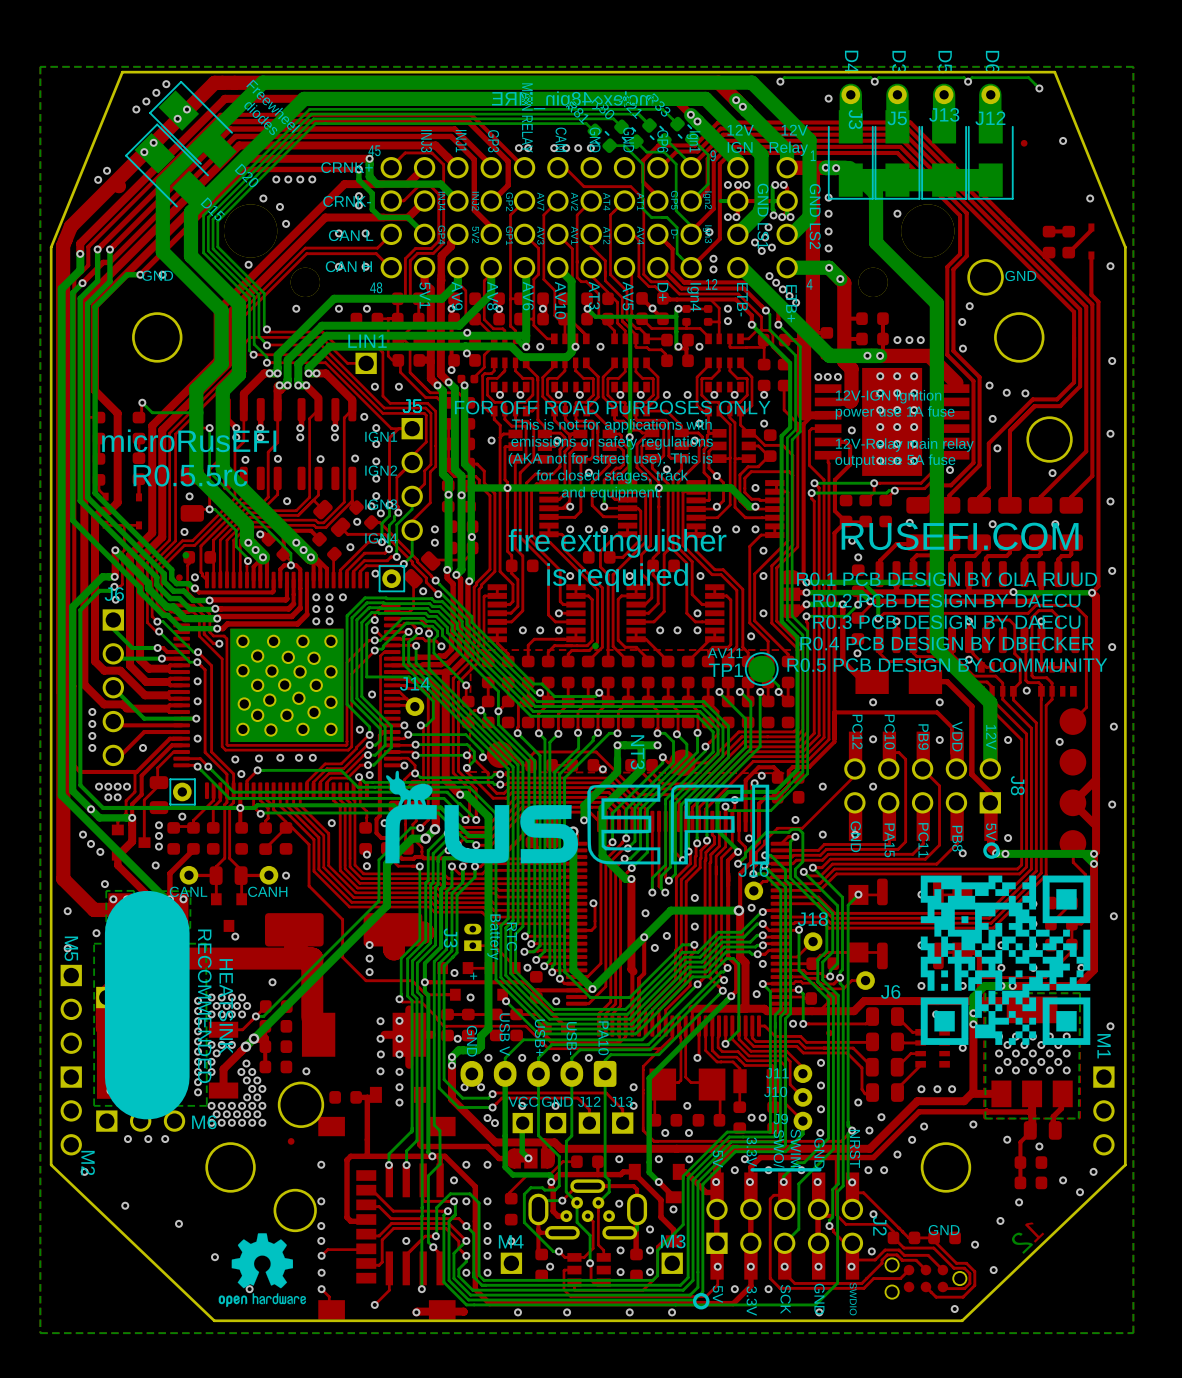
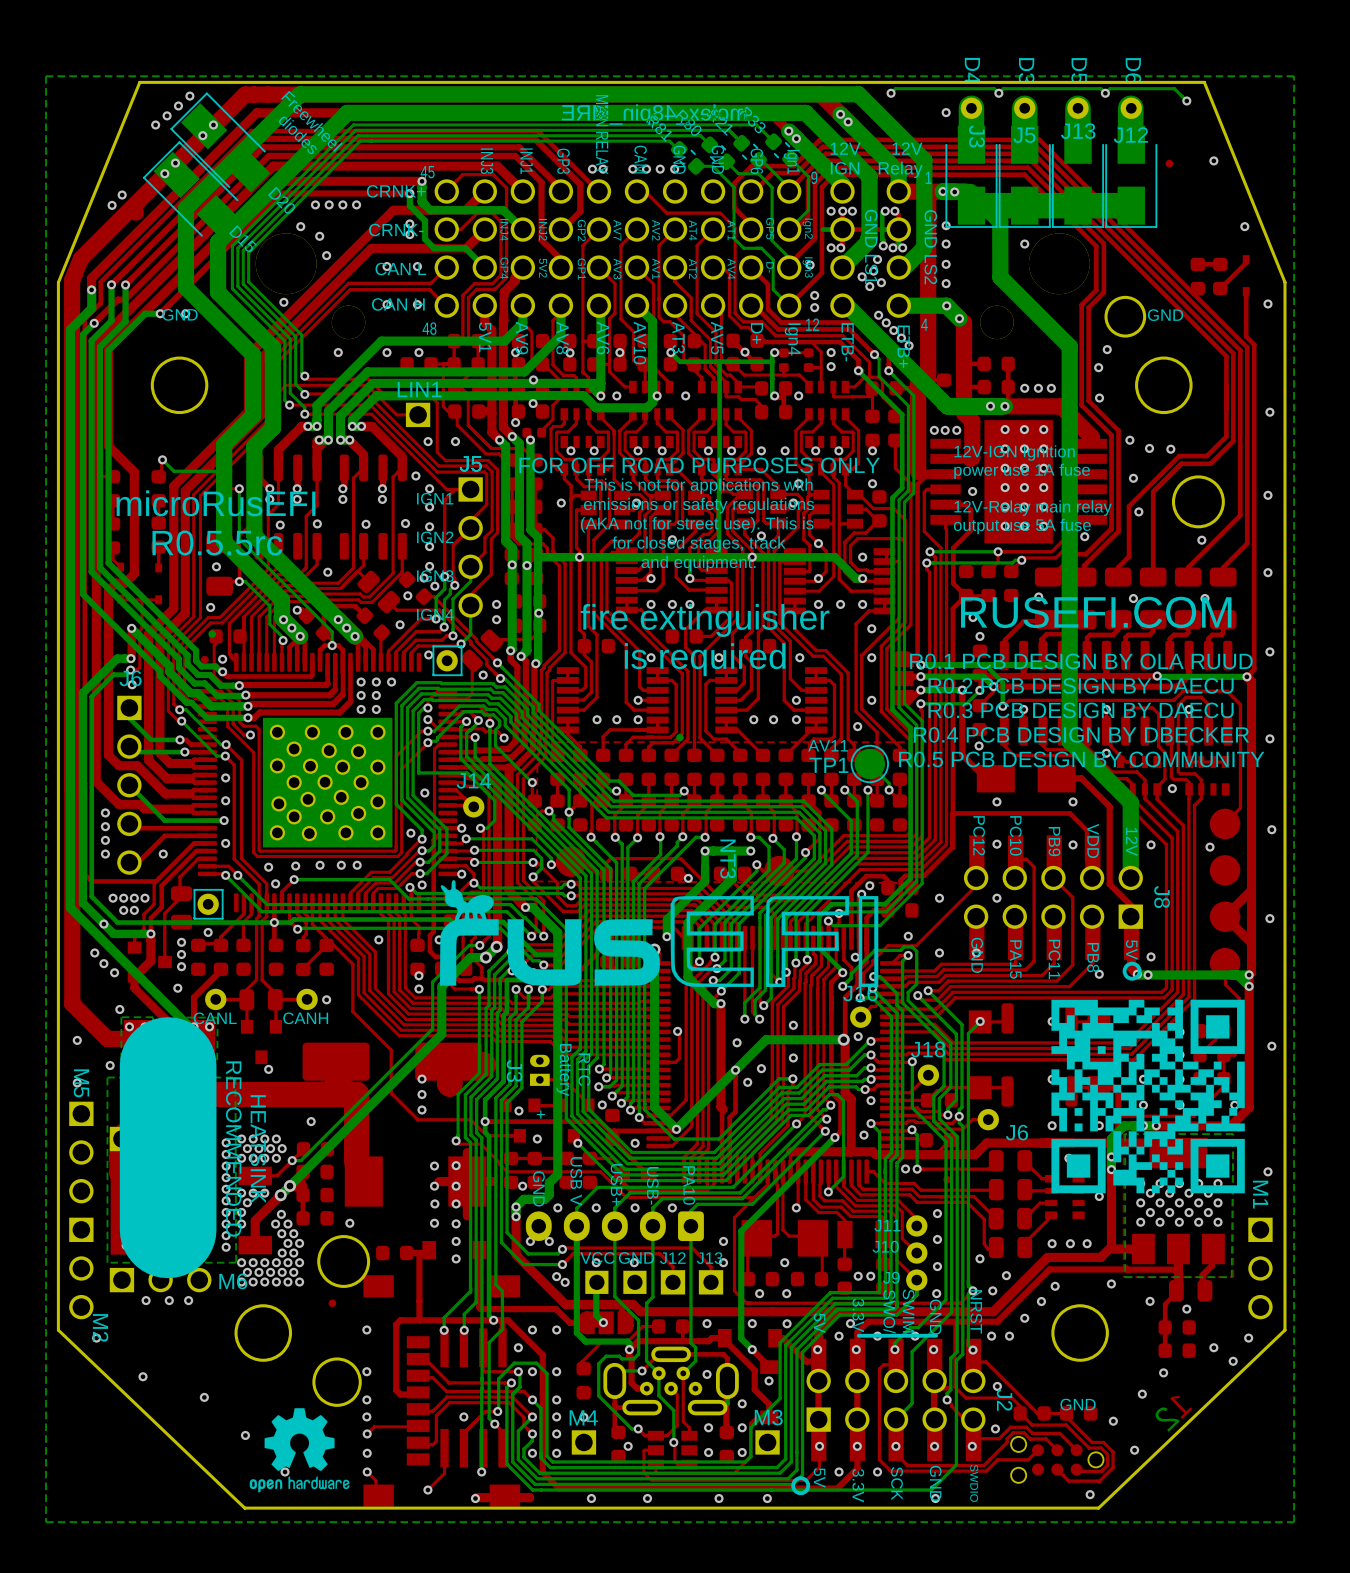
via: (629, 437) -> none

